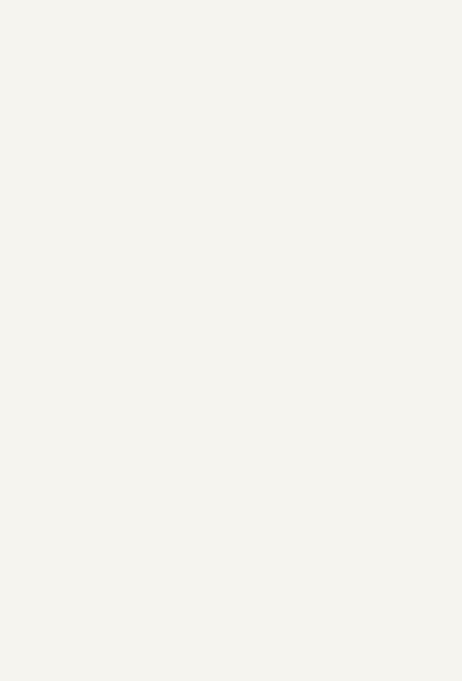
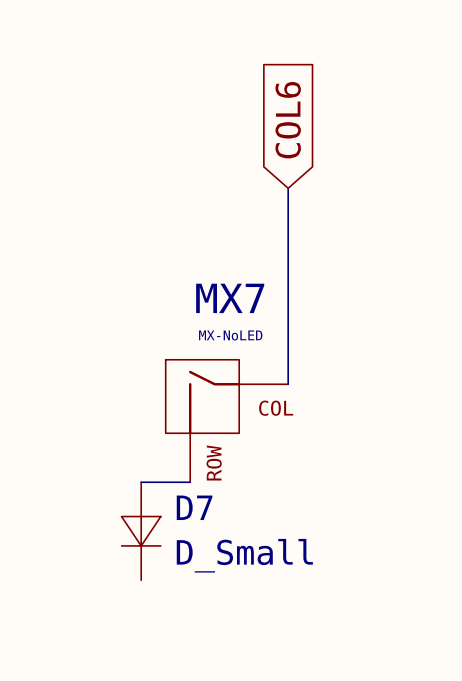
global label: none -> COL6 (288, 120)
wire: none -> (288, 188) (288, 384)
MX7: none -> MX-NoLED (226, 421)
wire: none -> (141, 482) (190, 482)
D7: none -> D_Small (141, 531)

